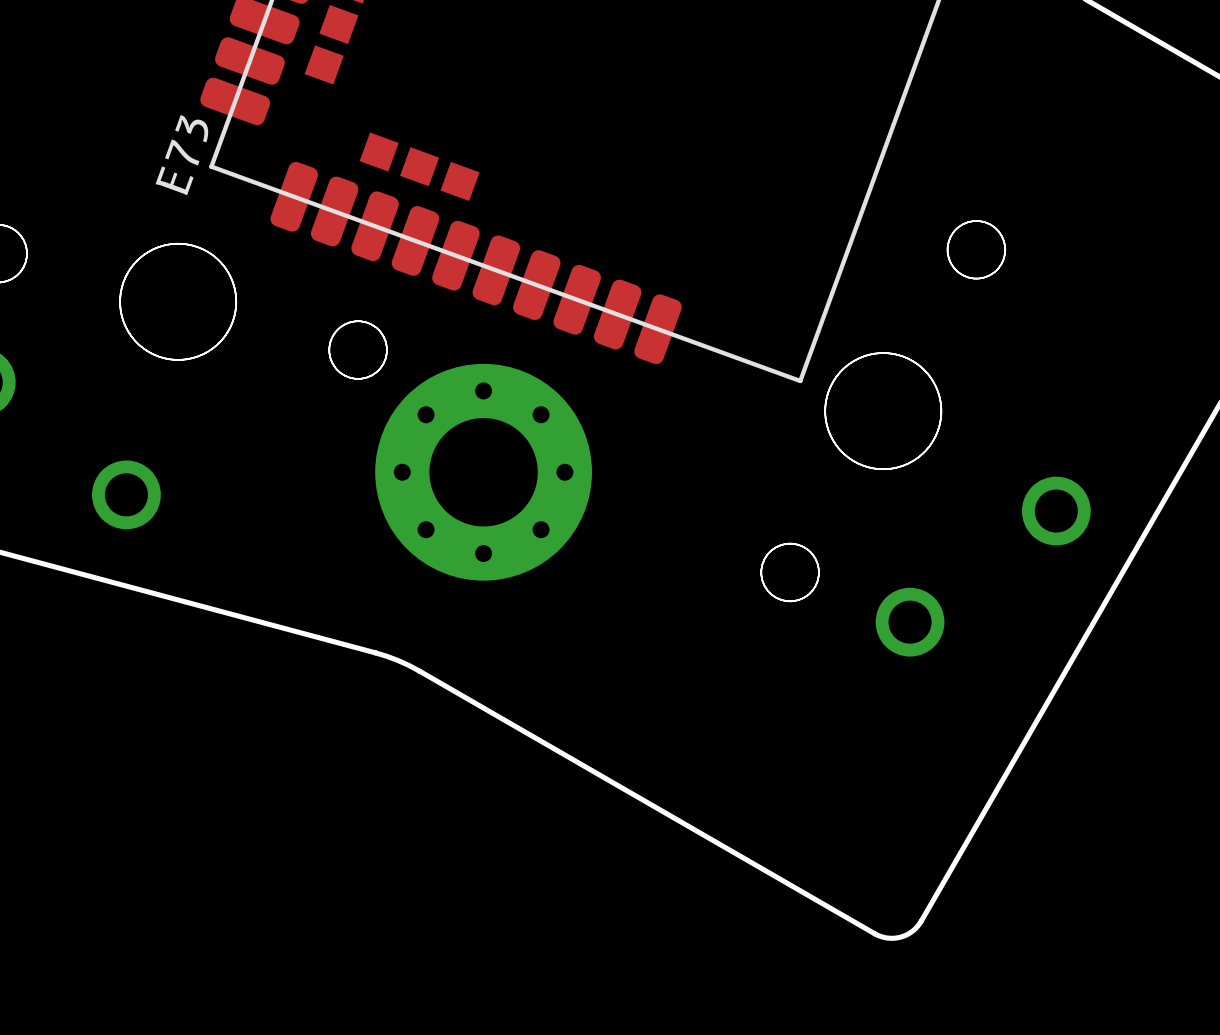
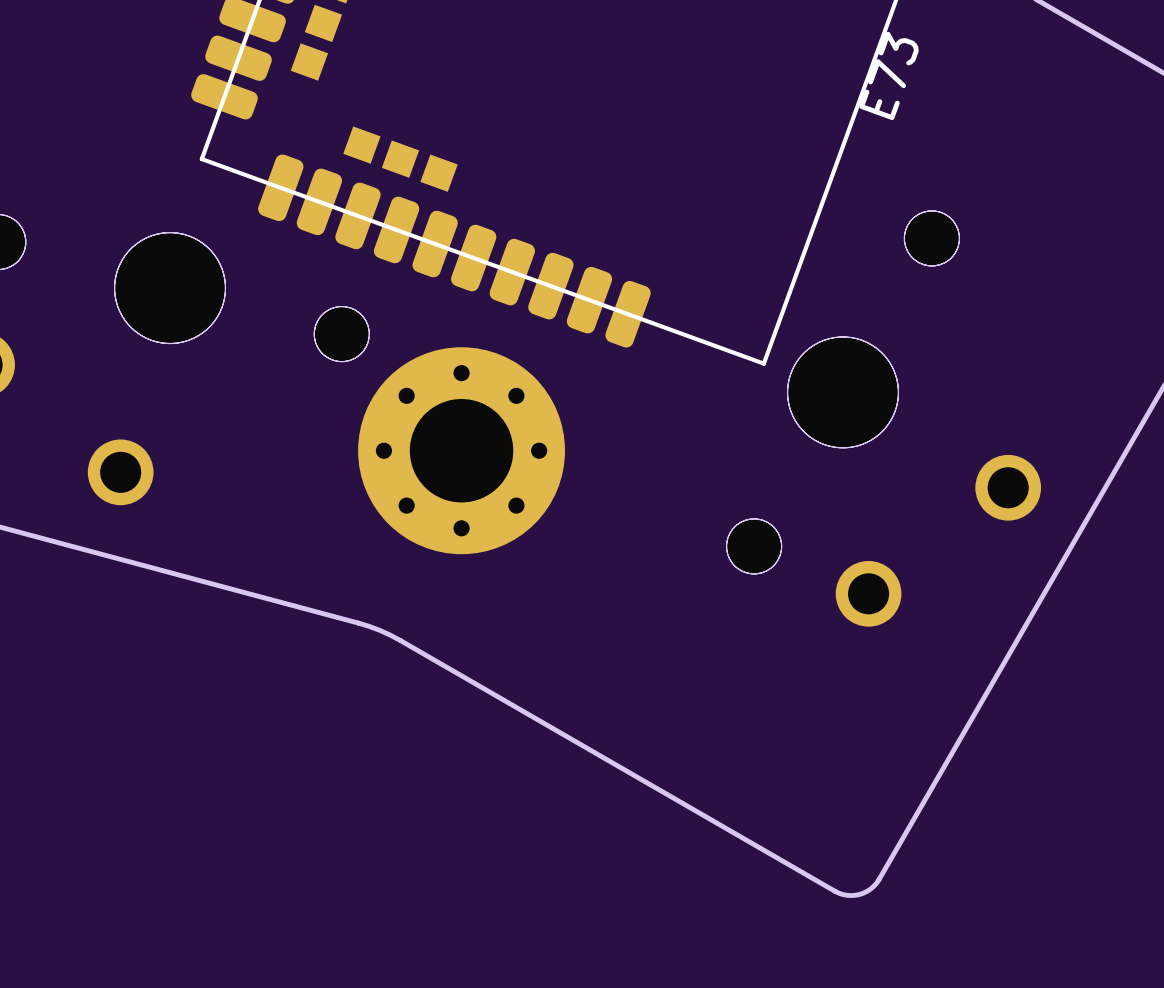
E73 name position: E73 (181, 155) -> E73 (888, 75)

